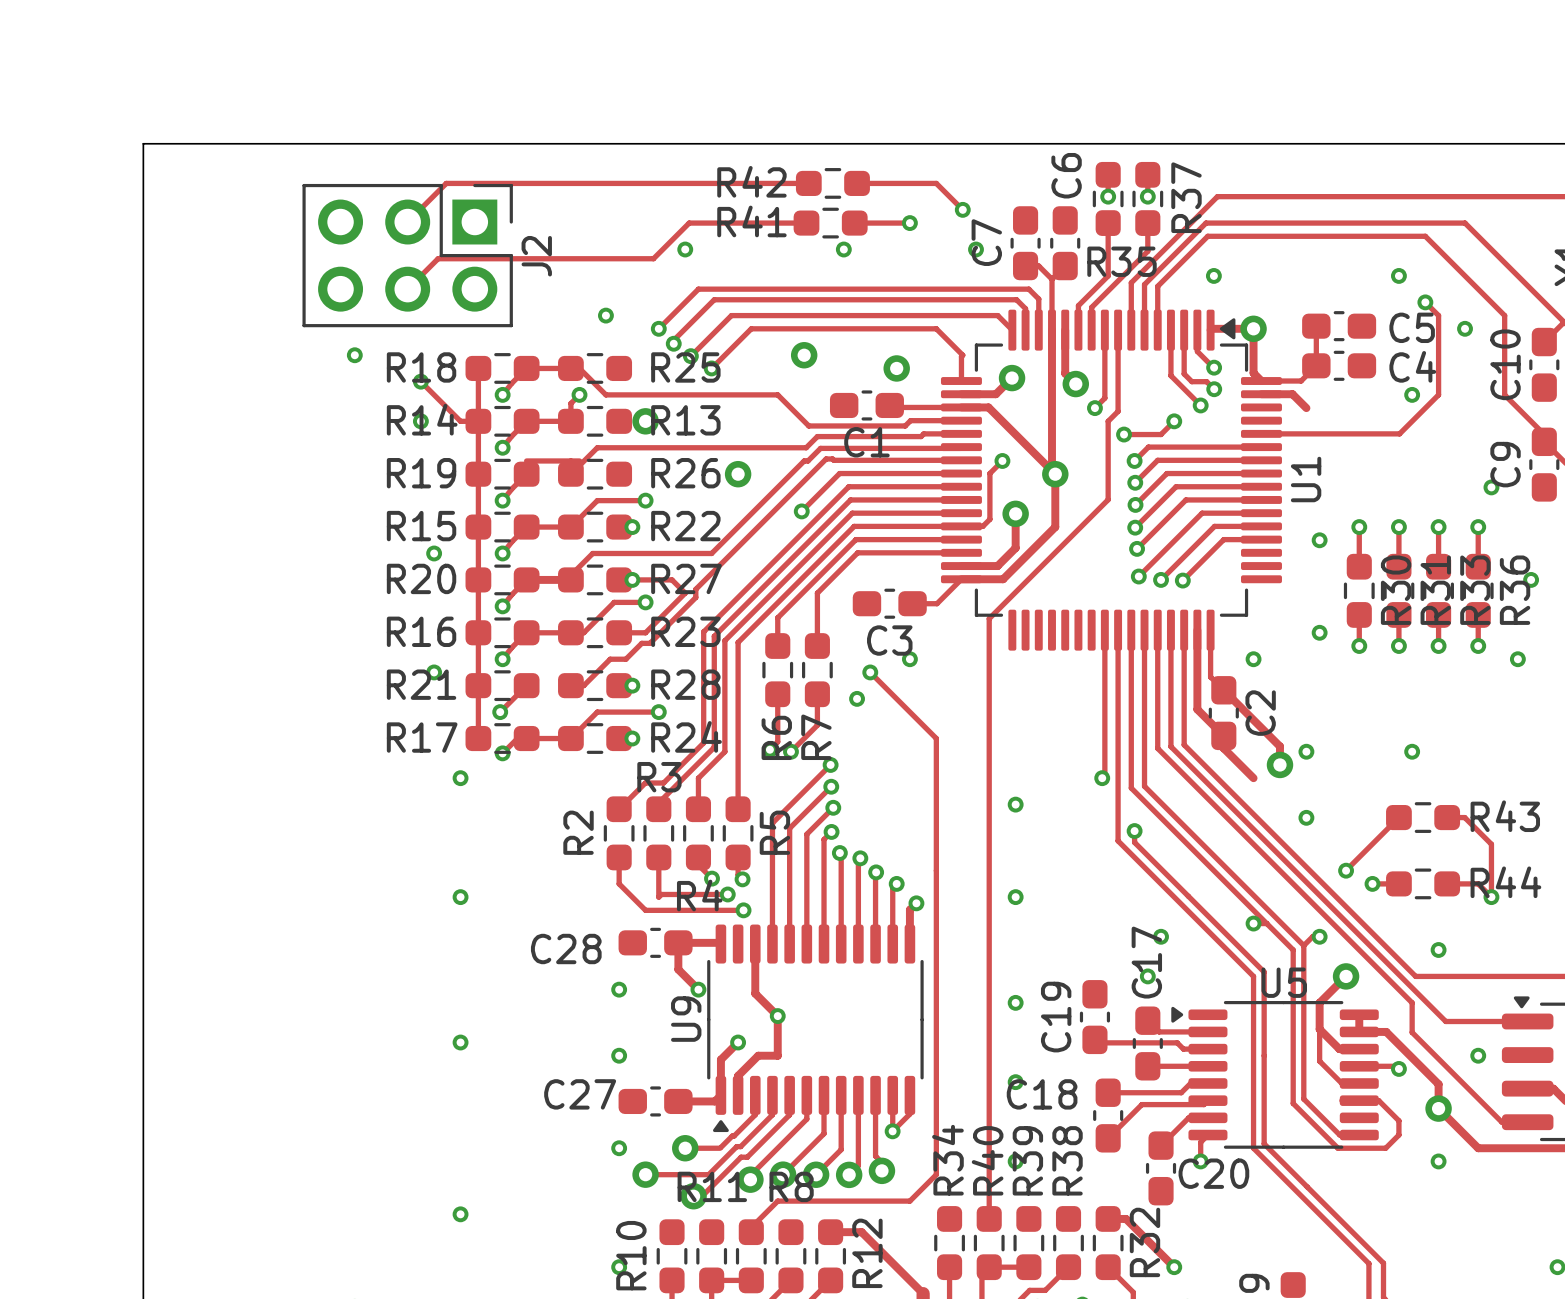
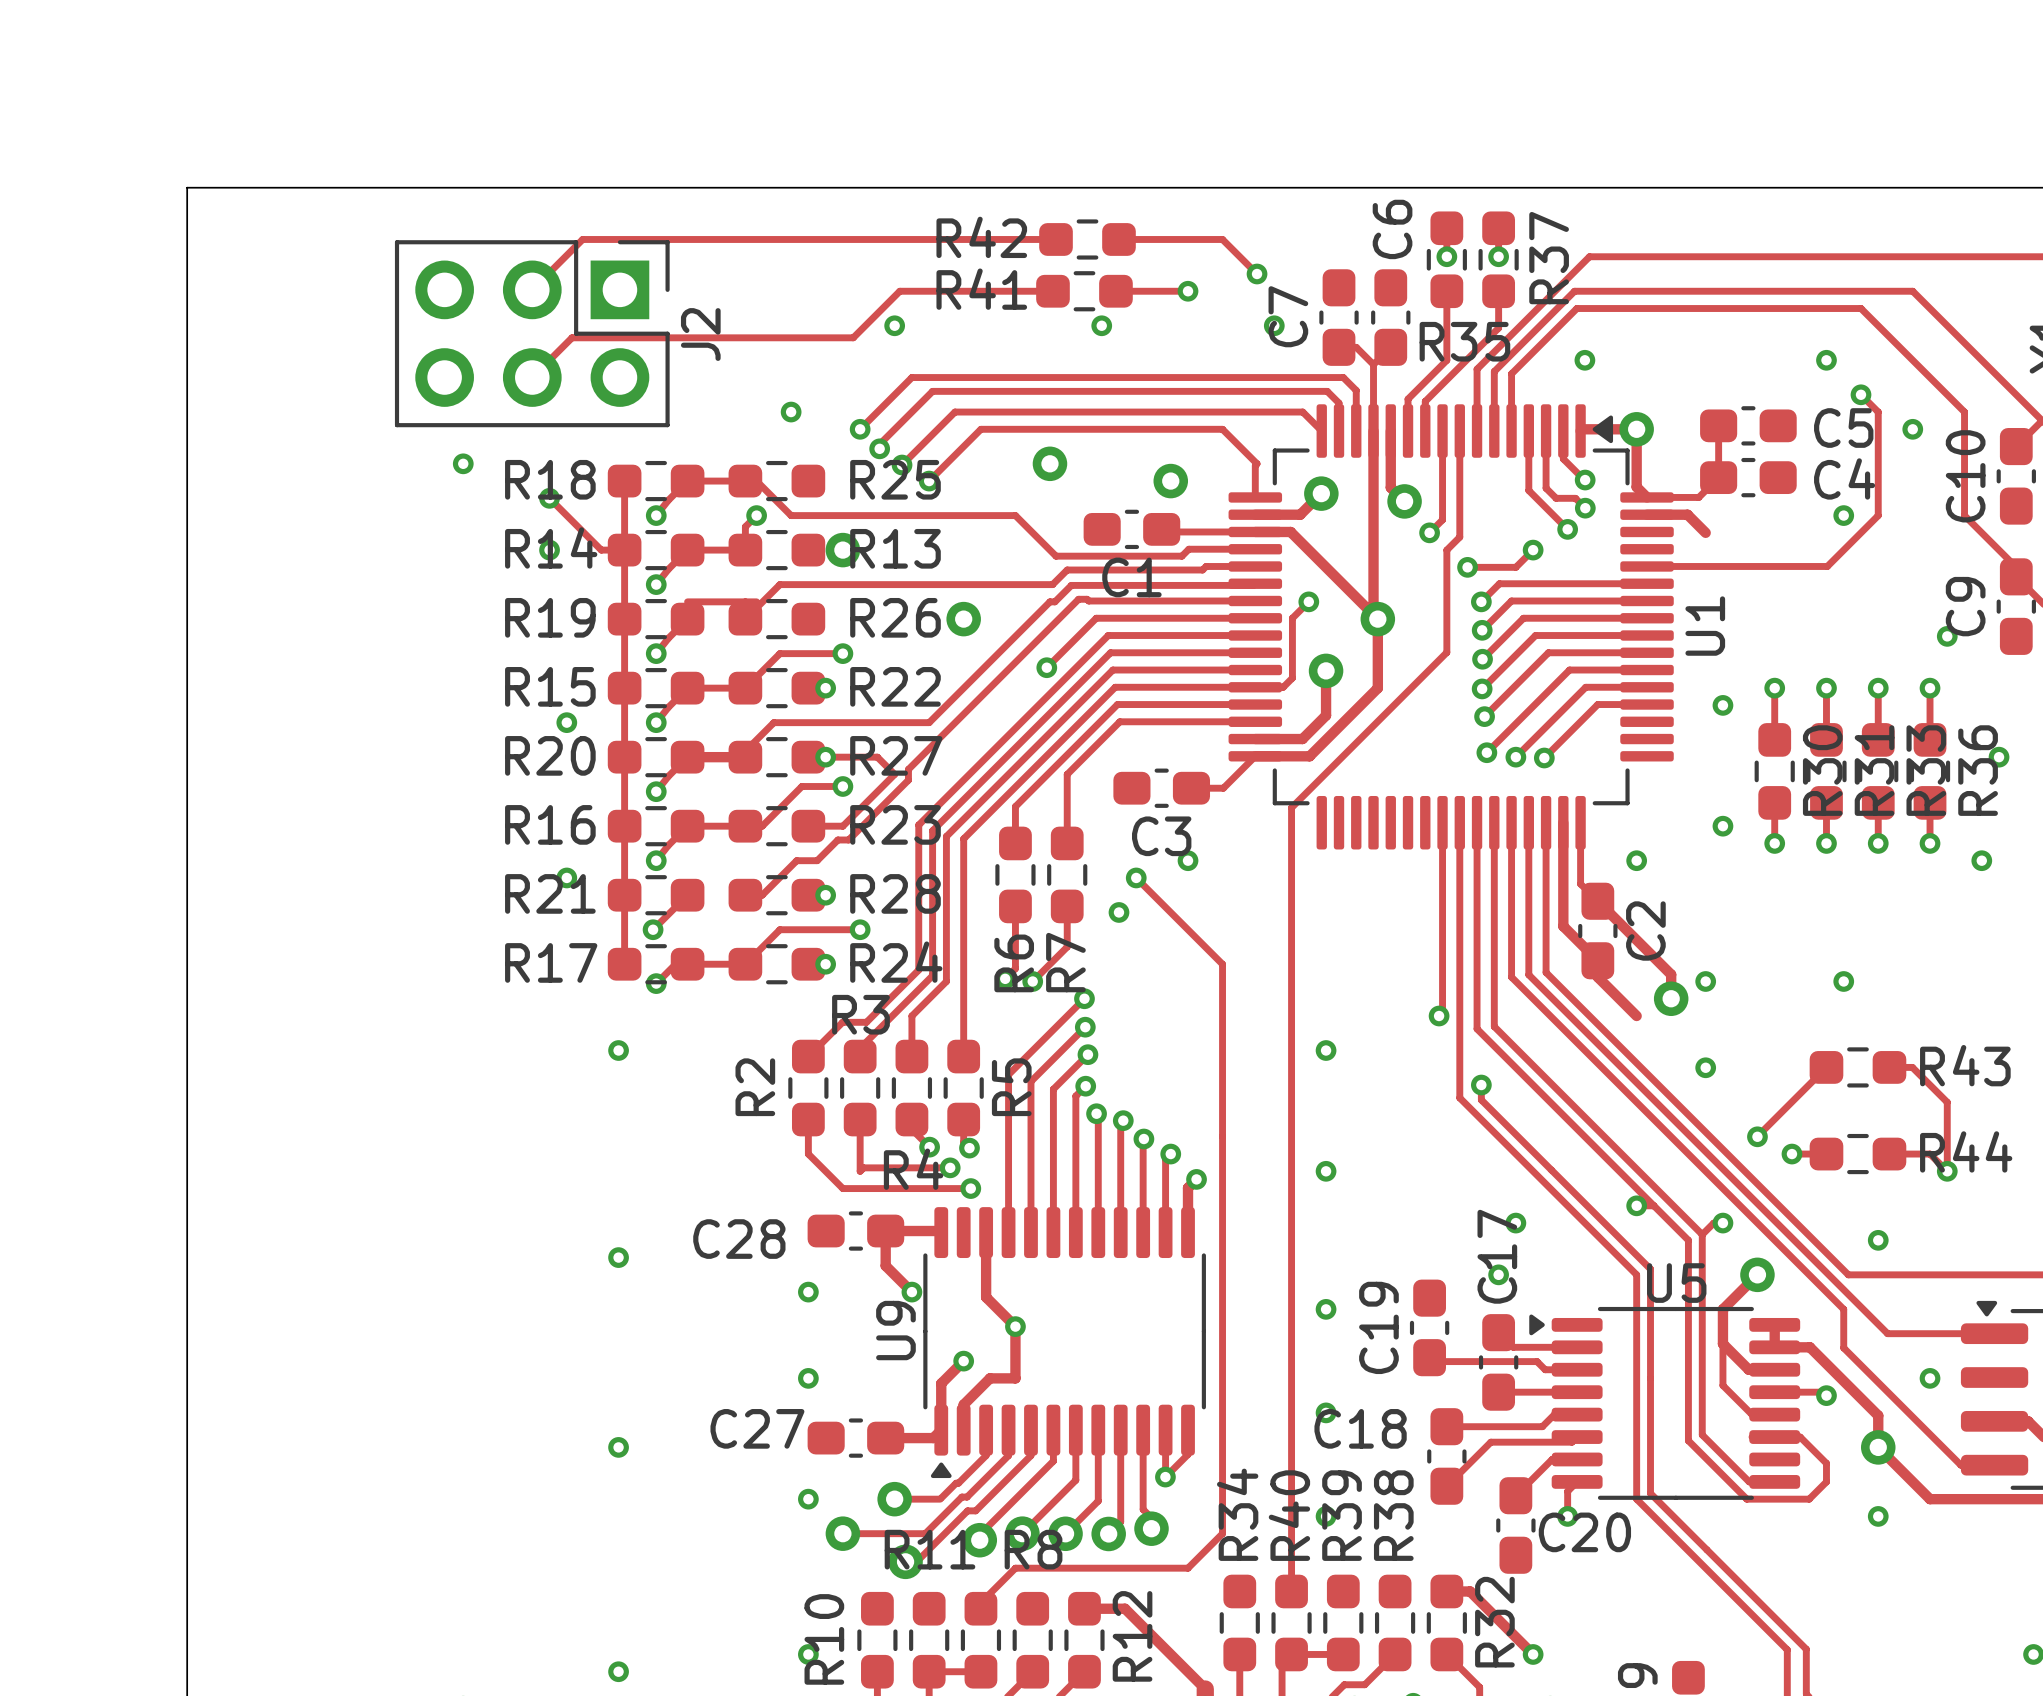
via position: (460, 778) -> (618, 1050)
via: (460, 897) -> none
via: none -> (618, 1257)
via: (460, 1042) -> none
via: none -> (618, 1447)
via: (460, 1214) -> none
via: none -> (618, 1671)

